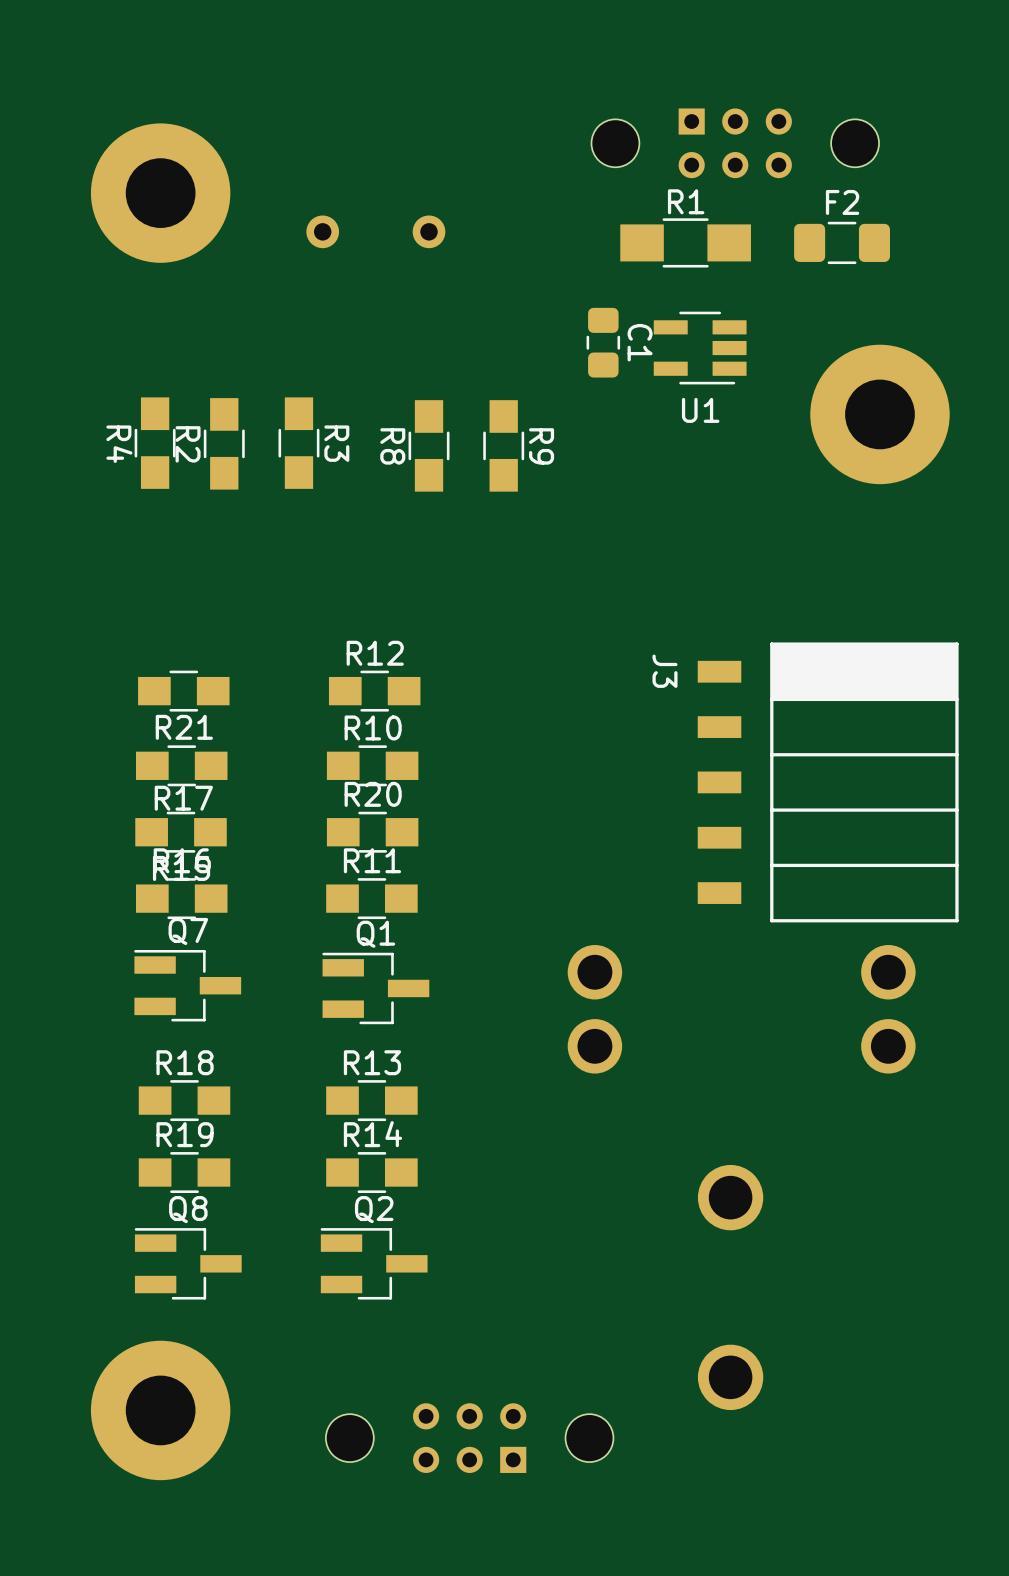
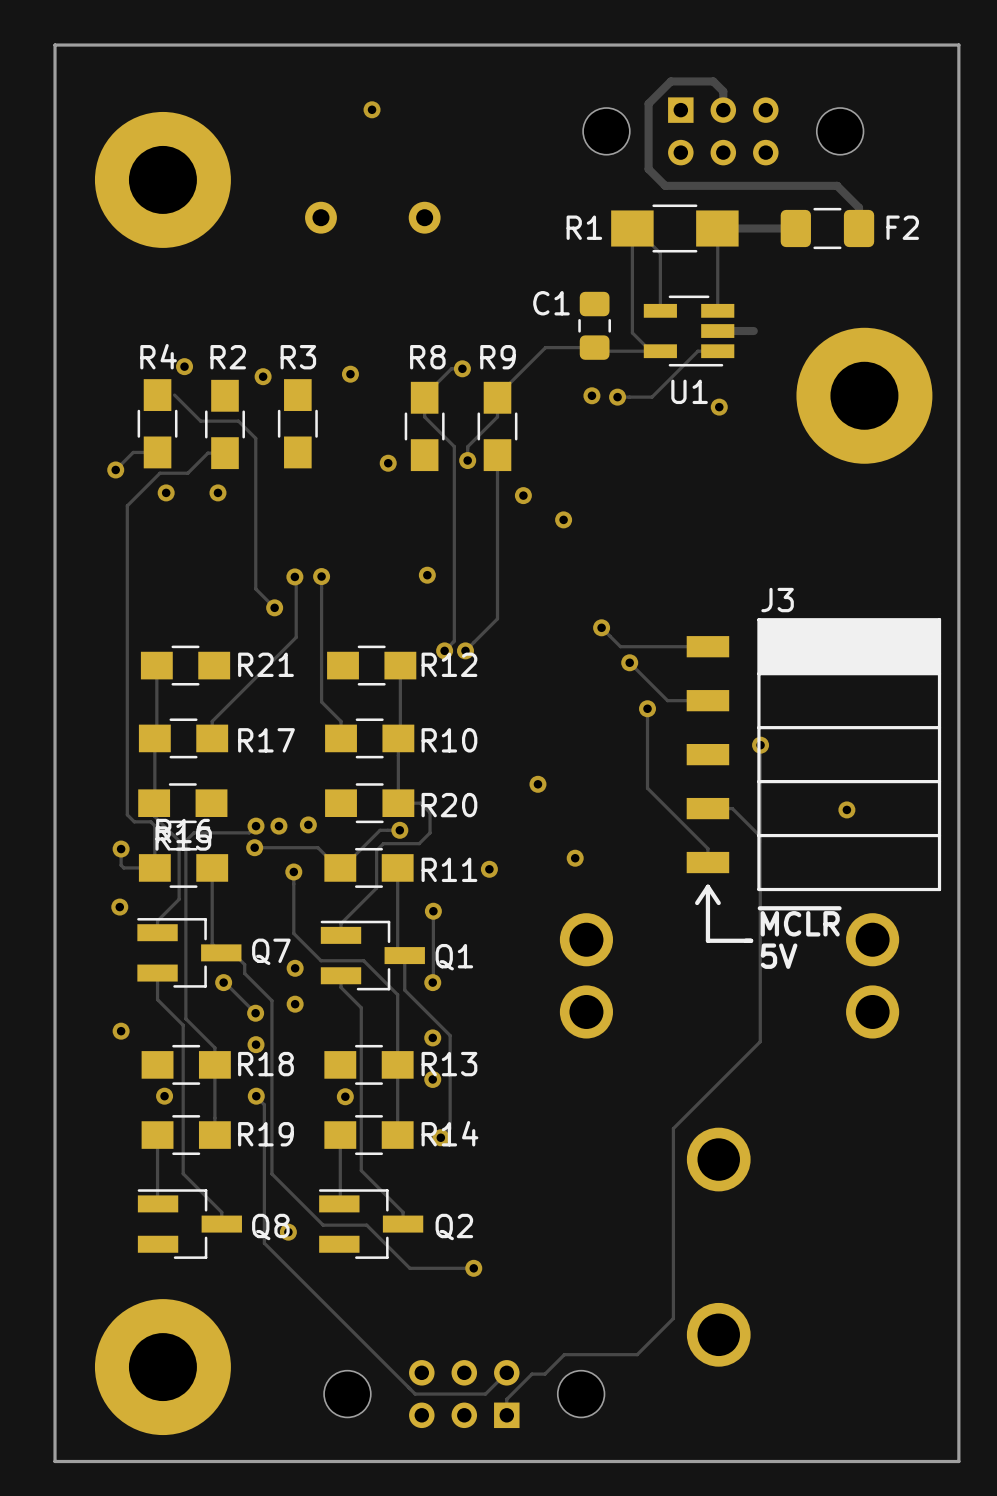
board edge: none -> (958, 45) (958, 1461) (55, 1461) (55, 45) (958, 45)
via: none -> (372, 109)
track: none -> (723, 110) (723, 91) (713, 81) (670, 81) (648, 103) (648, 169) (665, 185) (837, 185) (859, 207) (859, 228)
R1 name position: R1 (686, 201) -> R1 (584, 227)
F2 name position: F2 (842, 202) -> F2 (902, 227)
track: none -> (795, 228) (717, 228) (717, 310)
track: none -> (660, 310) (660, 253) (635, 228) (632, 228) (632, 332) (650, 351)
C1 name rotation: 0° (640, 342) -> 90° counterclockwise (551, 303)
C1 name position: C1 (640, 342) -> C1 (551, 303)
track: none -> (753, 331) (717, 331)
track: none -> (660, 351) (598, 351) (594, 347) (545, 347) (497, 395) (497, 416) (467, 446) (467, 460)
track: none -> (717, 351) (697, 351) (652, 397) (617, 397)
via: none -> (184, 366)
track: none -> (462, 368) (451, 368) (424, 395) (424, 416) (454, 446) (454, 641) (444, 650)
via: none -> (462, 368)
via: none -> (350, 374)
via: none -> (263, 376)
track: none -> (174, 395) (200, 421) (238, 421) (255, 438) (255, 588) (274, 607)
via: none -> (591, 395)
via: none -> (617, 397)
via: none -> (719, 407)
R3 name rotation: 0° (336, 443) -> 90° counterclockwise (298, 357)
R3 name position: R3 (336, 443) -> R3 (298, 357)
R4 name rotation: 0° (119, 444) -> 90° counterclockwise (158, 356)
R4 name position: R4 (119, 444) -> R4 (158, 356)
R2 name rotation: 0° (188, 444) -> 90° counterclockwise (228, 357)
R2 name position: R2 (188, 444) -> R2 (228, 357)
R8 name rotation: 0° (392, 446) -> 90° counterclockwise (427, 357)
R8 name position: R8 (392, 446) -> R8 (427, 357)
R9 name rotation: 0° (541, 446) -> 90° counterclockwise (498, 357)
R9 name position: R9 (541, 446) -> R9 (498, 357)
track: none -> (157, 452) (133, 452) (115, 469)
track: none -> (224, 453) (207, 453) (187, 473) (159, 473) (127, 505) (127, 814) (134, 821) (150, 821) (154, 825) (154, 867) (123, 867) (121, 865) (121, 849)
track: none -> (497, 455) (497, 618) (465, 650)
via: none -> (467, 460)
via: none -> (388, 463)
via: none -> (115, 469)
via: none -> (166, 492)
via: none -> (217, 492)
via: none -> (523, 495)
via: none -> (563, 519)
via: none -> (427, 575)
track: none -> (321, 576) (321, 701) (341, 721) (341, 738)
via: none -> (321, 576)
track: none -> (294, 576) (296, 637) (212, 721) (212, 738)
via: none -> (294, 576)
via: none -> (274, 607)
track: none -> (601, 627) (620, 646) (707, 646)
via: none -> (601, 627)
R12 name position: R12 (375, 653) -> R12 (449, 664)
J3 name rotation: 0° (664, 671) -> 90° counterclockwise (777, 600)
J3 name position: J3 (664, 671) -> J3 (777, 600)
via: none -> (444, 650)
via: none -> (465, 650)
track: none -> (629, 662) (667, 700) (707, 700)
via: none -> (629, 662)
track: none -> (156, 665) (154, 815) (179, 840) (179, 899) (157, 920) (157, 932)
track: none -> (400, 665) (398, 803) (420, 803) (430, 812) (430, 832) (419, 843) (383, 843) (376, 850) (376, 888) (341, 923) (341, 935)
R21 name position: R21 (184, 727) -> R21 (265, 664)
R10 name position: R10 (373, 727) -> R10 (449, 740)
track: none -> (647, 708) (647, 788) (707, 848) (707, 862)
via: none -> (647, 708)
via: none -> (760, 745)
track: none -> (760, 745) (760, 1041) (673, 1128) (673, 1318) (637, 1354) (564, 1354) (544, 1374) (532, 1374) (506, 1399) (506, 1415)
R20 name position: R20 (373, 794) -> R20 (449, 805)
R17 name position: R17 (183, 798) -> R17 (266, 740)
via: none -> (537, 784)
track: none -> (707, 808) (732, 808) (760, 836)
via: none -> (846, 809)
via: none -> (308, 824)
track: none -> (256, 826) (249, 832) (193, 832) (185, 840) (185, 1018) (214, 1047) (214, 1135)
via: none -> (256, 826)
via: none -> (278, 826)
R11 name position: R11 (372, 860) -> R11 (449, 869)
track: none -> (399, 830) (380, 830) (342, 867) (338, 867) (317, 847) (254, 847)
via: none -> (399, 830)
via: none -> (254, 847)
via: none -> (121, 849)
via: none -> (575, 858)
track: none -> (212, 867) (212, 943) (221, 952) (232, 952) (244, 964) (244, 973) (271, 1000) (271, 1173) (323, 1225) (366, 1225) (409, 1268) (473, 1268)
track: none -> (397, 867) (397, 948) (404, 955) (404, 990) (450, 1035) (450, 1128) (440, 1137)
via: none -> (489, 869)
track: none -> (293, 871) (293, 933) (321, 960) (363, 960) (397, 994) (397, 1135)
via: none -> (293, 871)
line: none -> (707, 886) (718, 903)
line: none -> (707, 886) (697, 903)
line: none -> (707, 886) (707, 940) (751, 940)
Q7 name position: Q7 (188, 931) -> Q7 (271, 951)
Q1 name position: Q1 (375, 934) -> Q1 (454, 957)
via: none -> (119, 907)
track: none -> (433, 911) (432, 982)
via: none -> (433, 911)
text: none -> ~{MCLR} (799, 921)
text: none -> 5V (779, 956)
via: none -> (295, 968)
track: none -> (157, 973) (157, 999) (183, 1025) (183, 1173) (221, 1212) (221, 1224)
track: none -> (341, 975) (341, 987) (361, 1007) (361, 1170) (403, 1212) (403, 1224)
track: none -> (223, 982) (255, 1013)
via: none -> (223, 982)
via: none -> (432, 982)
via: none -> (295, 1004)
via: none -> (255, 1013)
R18 name position: R18 (185, 1062) -> R18 (265, 1064)
R13 name position: R13 (372, 1062) -> R13 (449, 1064)
via: none -> (121, 1031)
via: none -> (432, 1037)
via: none -> (256, 1044)
via: none -> (432, 1079)
via: none -> (164, 1096)
track: none -> (256, 1096) (264, 1104) (264, 1243) (415, 1394) (485, 1394) (506, 1372)
via: none -> (256, 1096)
via: none -> (345, 1096)
R19 name position: R19 (185, 1134) -> R19 (265, 1134)
R14 name position: R14 (372, 1134) -> R14 (449, 1133)
track: none -> (157, 1135) (158, 1203)
track: none -> (340, 1135) (339, 1203)
via: none -> (440, 1137)
Q8 name position: Q8 (188, 1209) -> Q8 (270, 1226)
Q2 name position: Q2 (374, 1209) -> Q2 (454, 1226)
via: none -> (288, 1232)
via: none -> (473, 1268)

